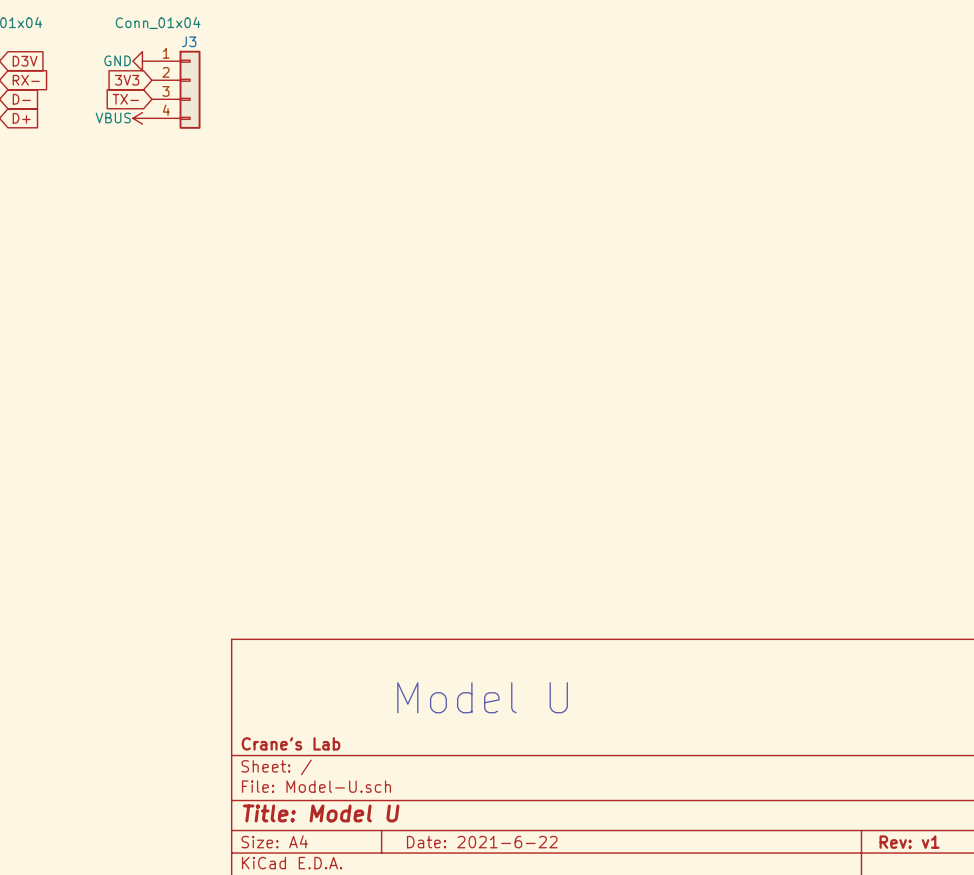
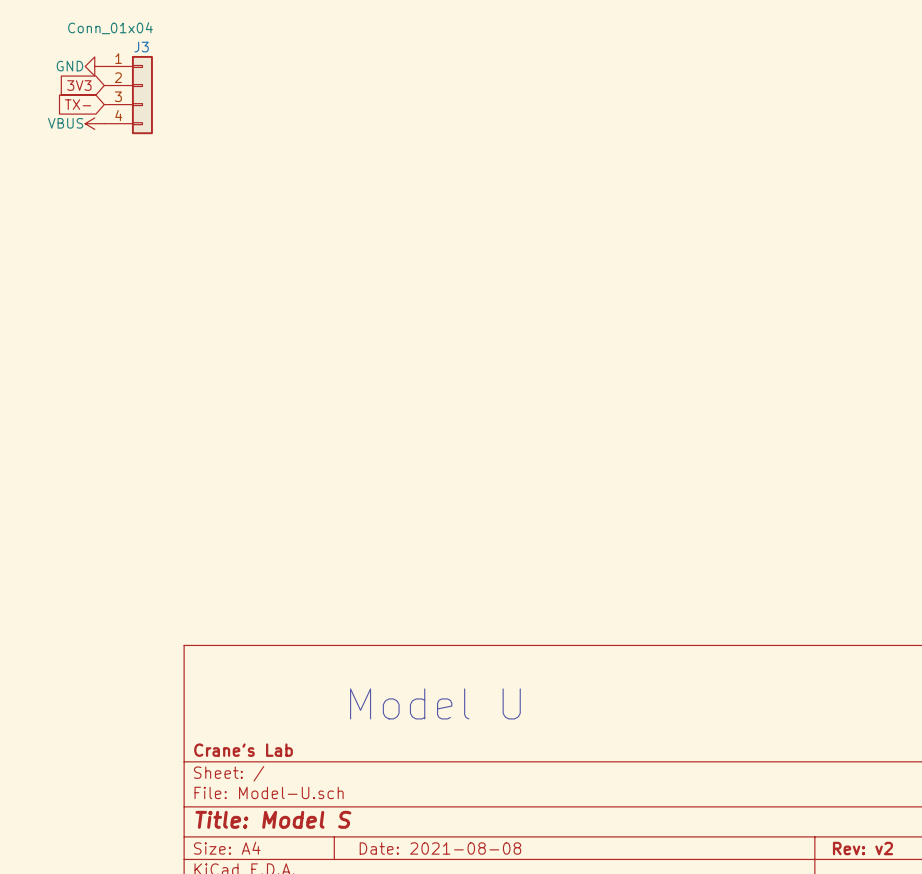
title block: Title: Model U (321, 813) -> Title: Model S (273, 819)
title block: Date: 2021-6-22 (482, 842) -> Date: 2021-08-08 (440, 848)
title block: Rev: v1 (909, 842) -> Rev: v2 (863, 848)

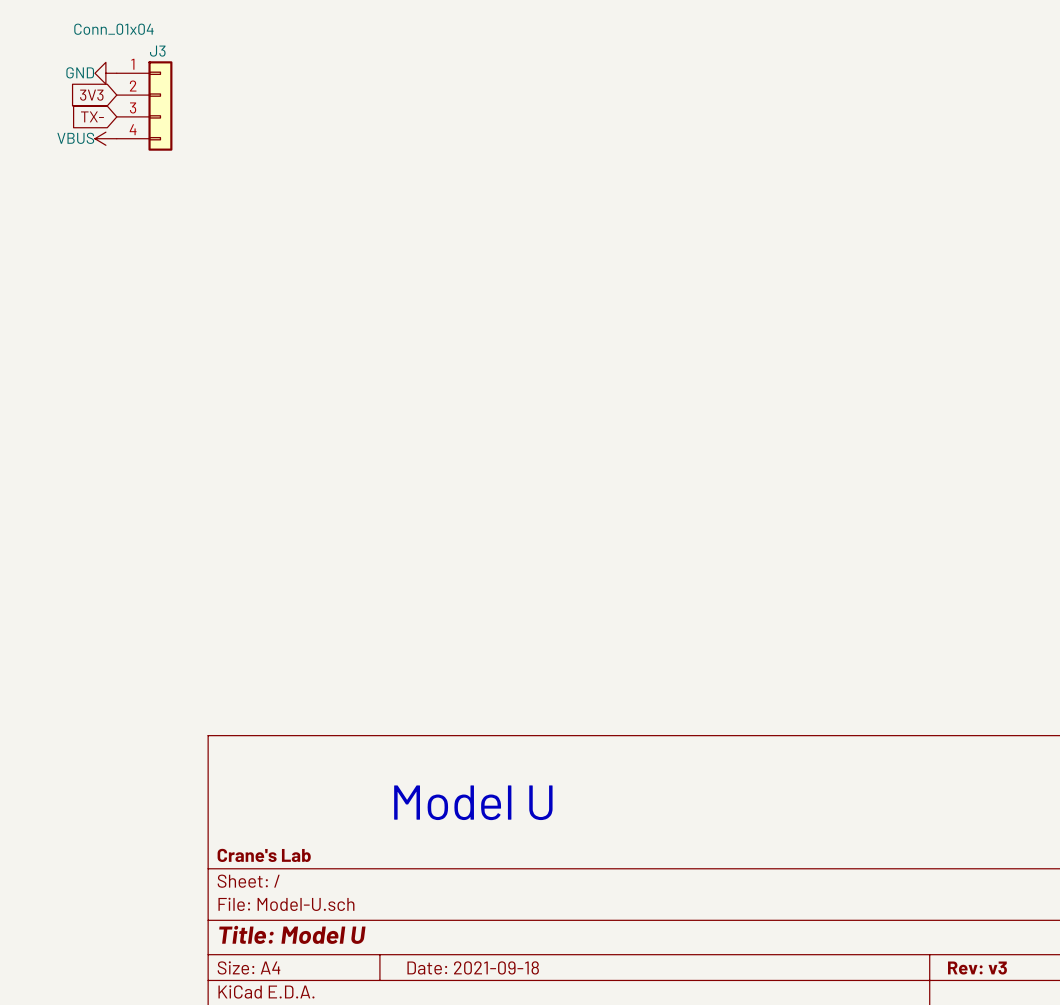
title block: Title: Model S (273, 819) -> Title: Model U (292, 934)
title block: Date: 2021-08-08 (440, 848) -> Date: 2021-09-18 (473, 967)
title block: Rev: v2 (863, 848) -> Rev: v3 (977, 968)

